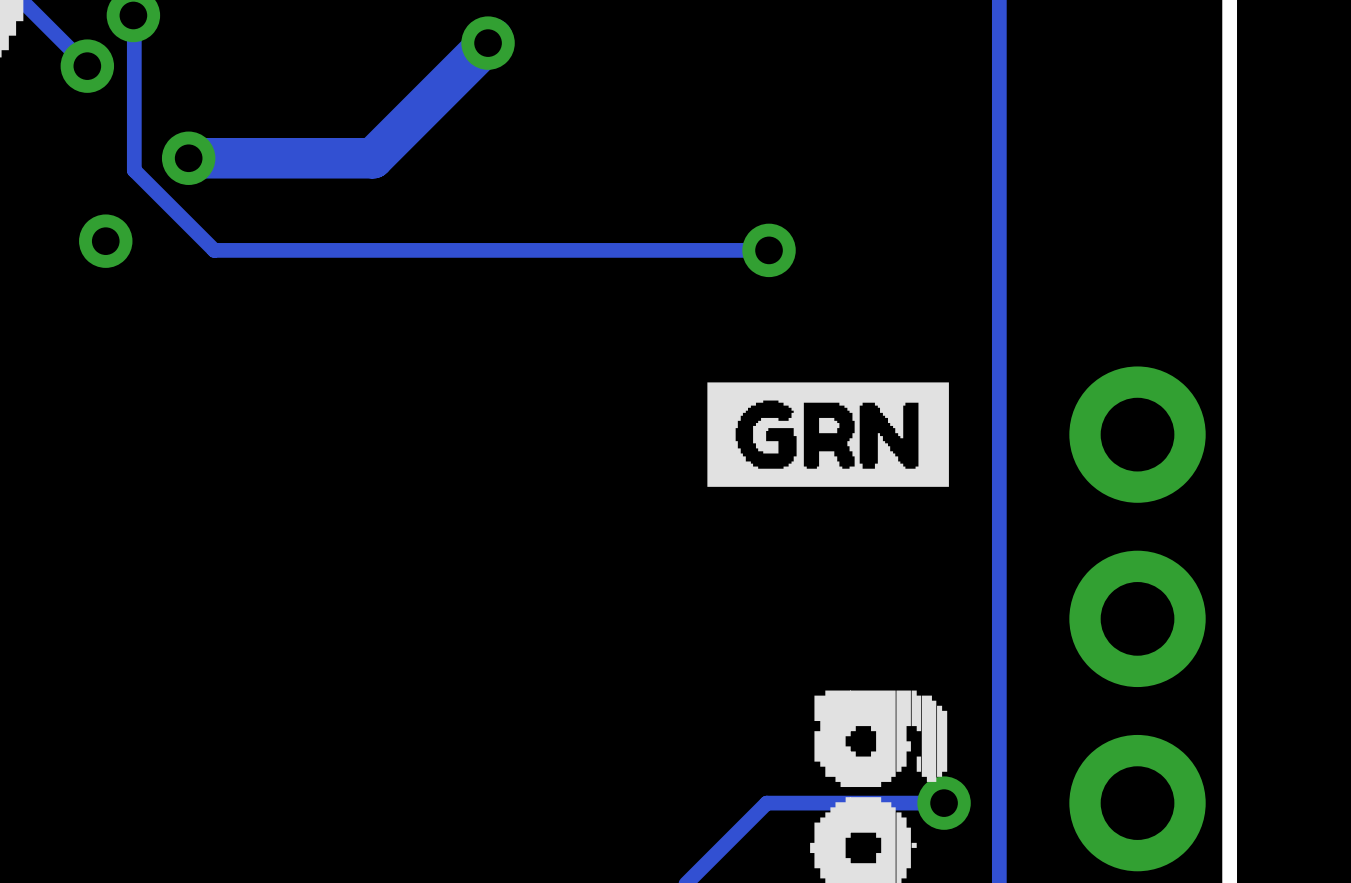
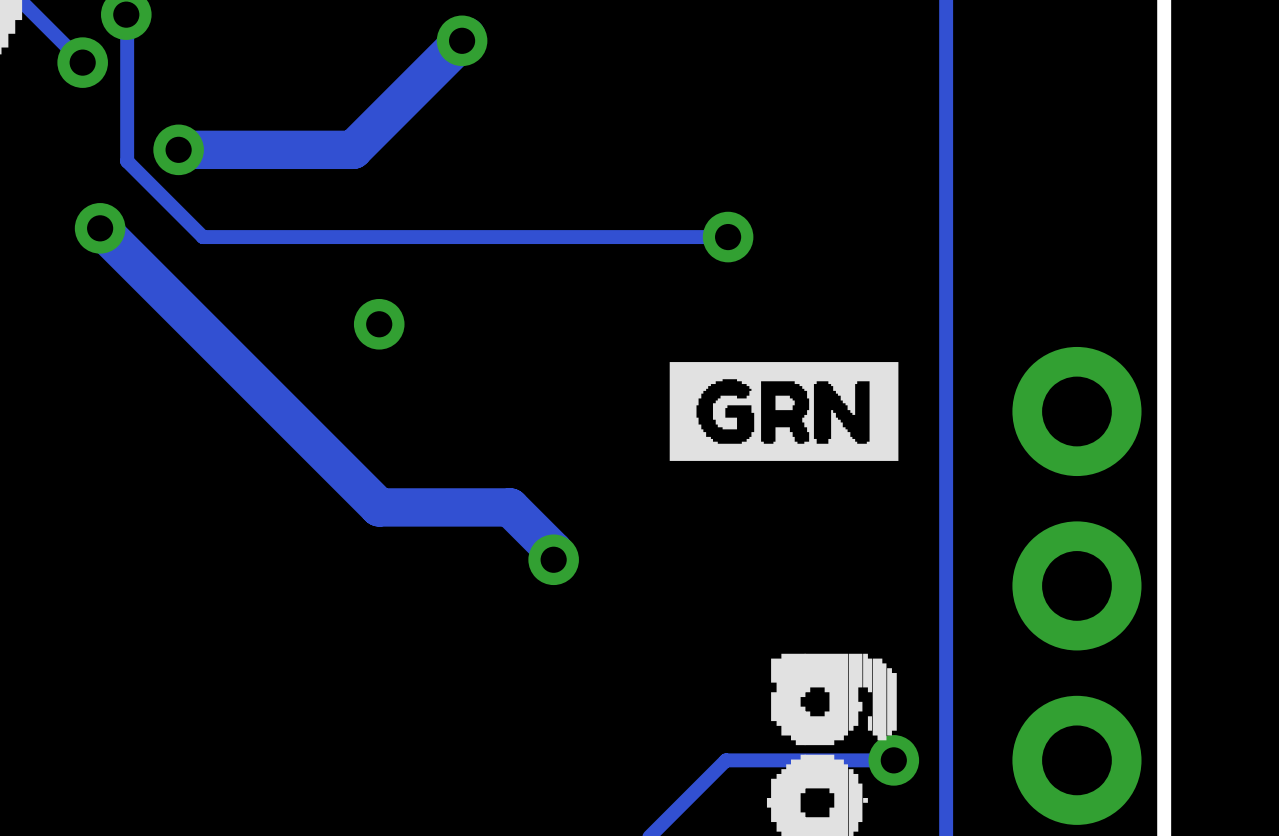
track: none -> (100, 228) (379, 507) (510, 507) (553, 551) (553, 559)
via: none -> (379, 324)
via: none -> (553, 559)

